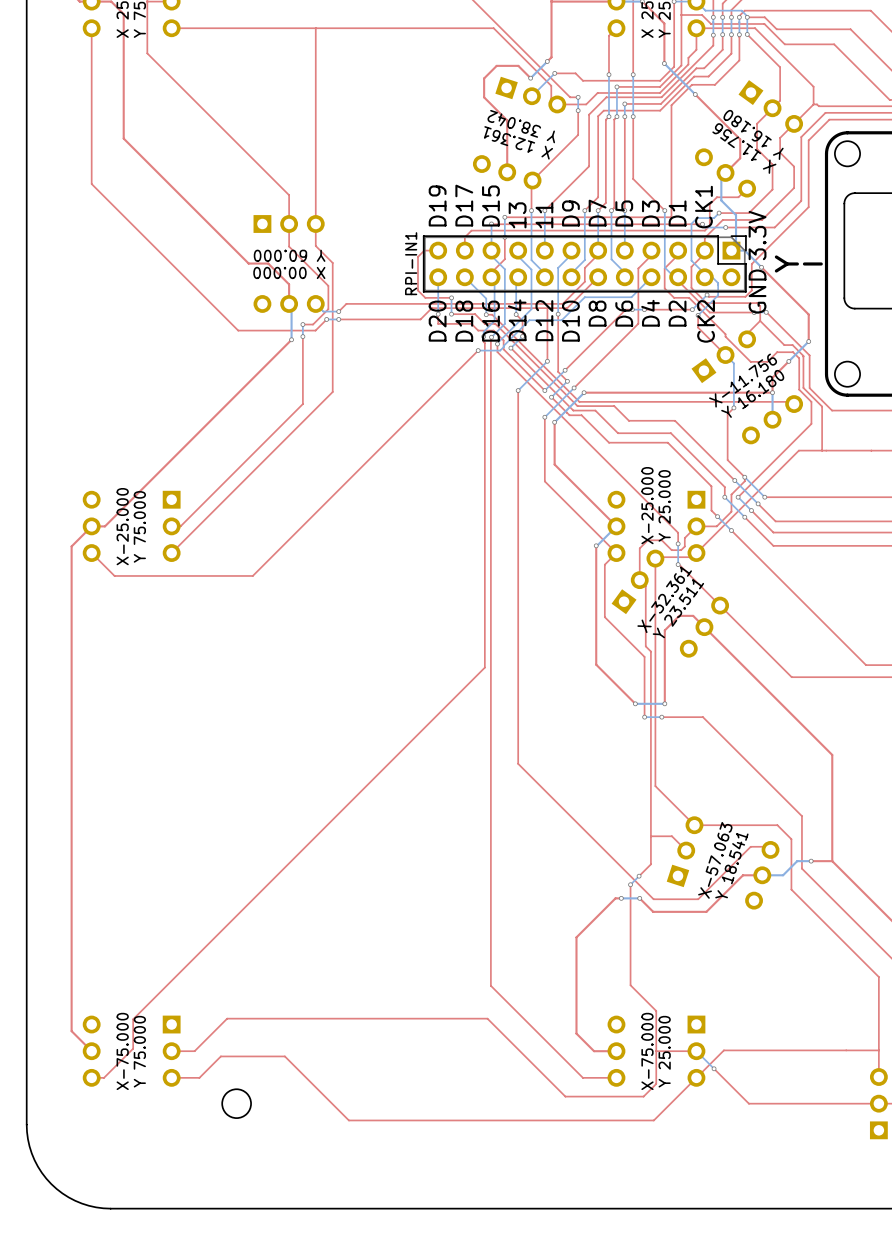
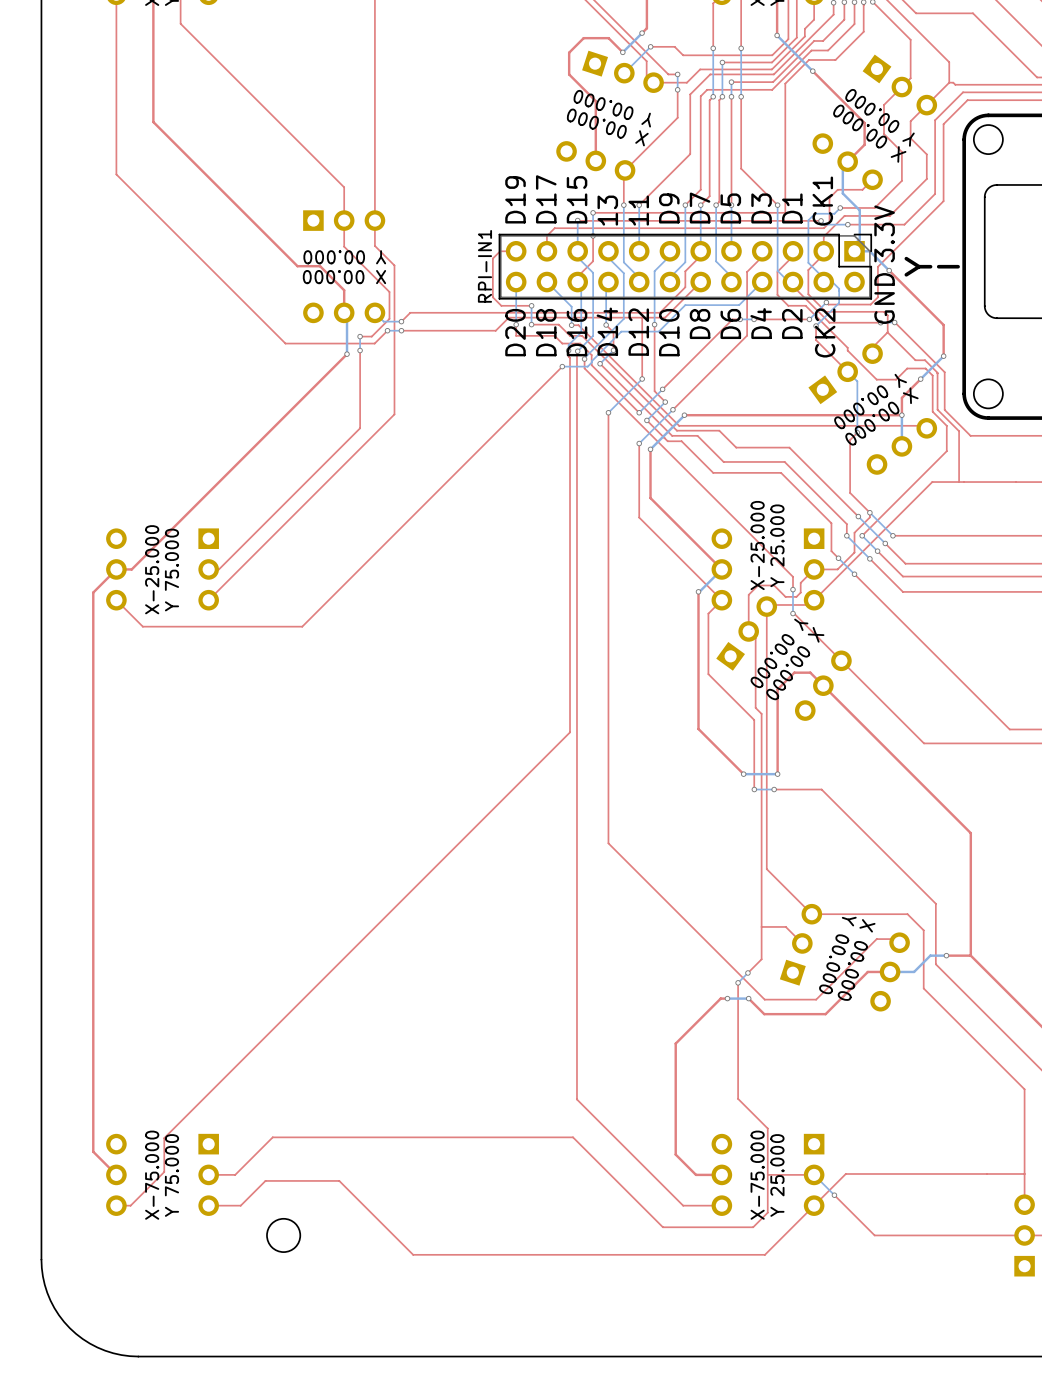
part text: Y 38.042 (521, 126) -> Y 00.000 (612, 108)
part text: Y 16.180 (753, 134) -> Y 00.000 (879, 117)
part text: X 12.361 (518, 142) -> X 00.000 (607, 127)
part text: X 11.756 (744, 148) -> X 00.000 (869, 133)
part text: Y 60.000 (289, 255) -> Y 00.000 (344, 257)
part text: X-11.756 (743, 380) -> Y 00.000 (870, 401)
part text: Y 16.180 (752, 393) -> X 00.000 (881, 416)
part text: X-32.361 (664, 599) -> Y 00.000 (779, 653)
part text: Y 23.511 (678, 608) -> X 00.000 (795, 663)
part text: X-57.063 (715, 860) -> Y 00.000 (837, 955)
part text: Y 18.541 (731, 865) -> X 00.000 (856, 959)

